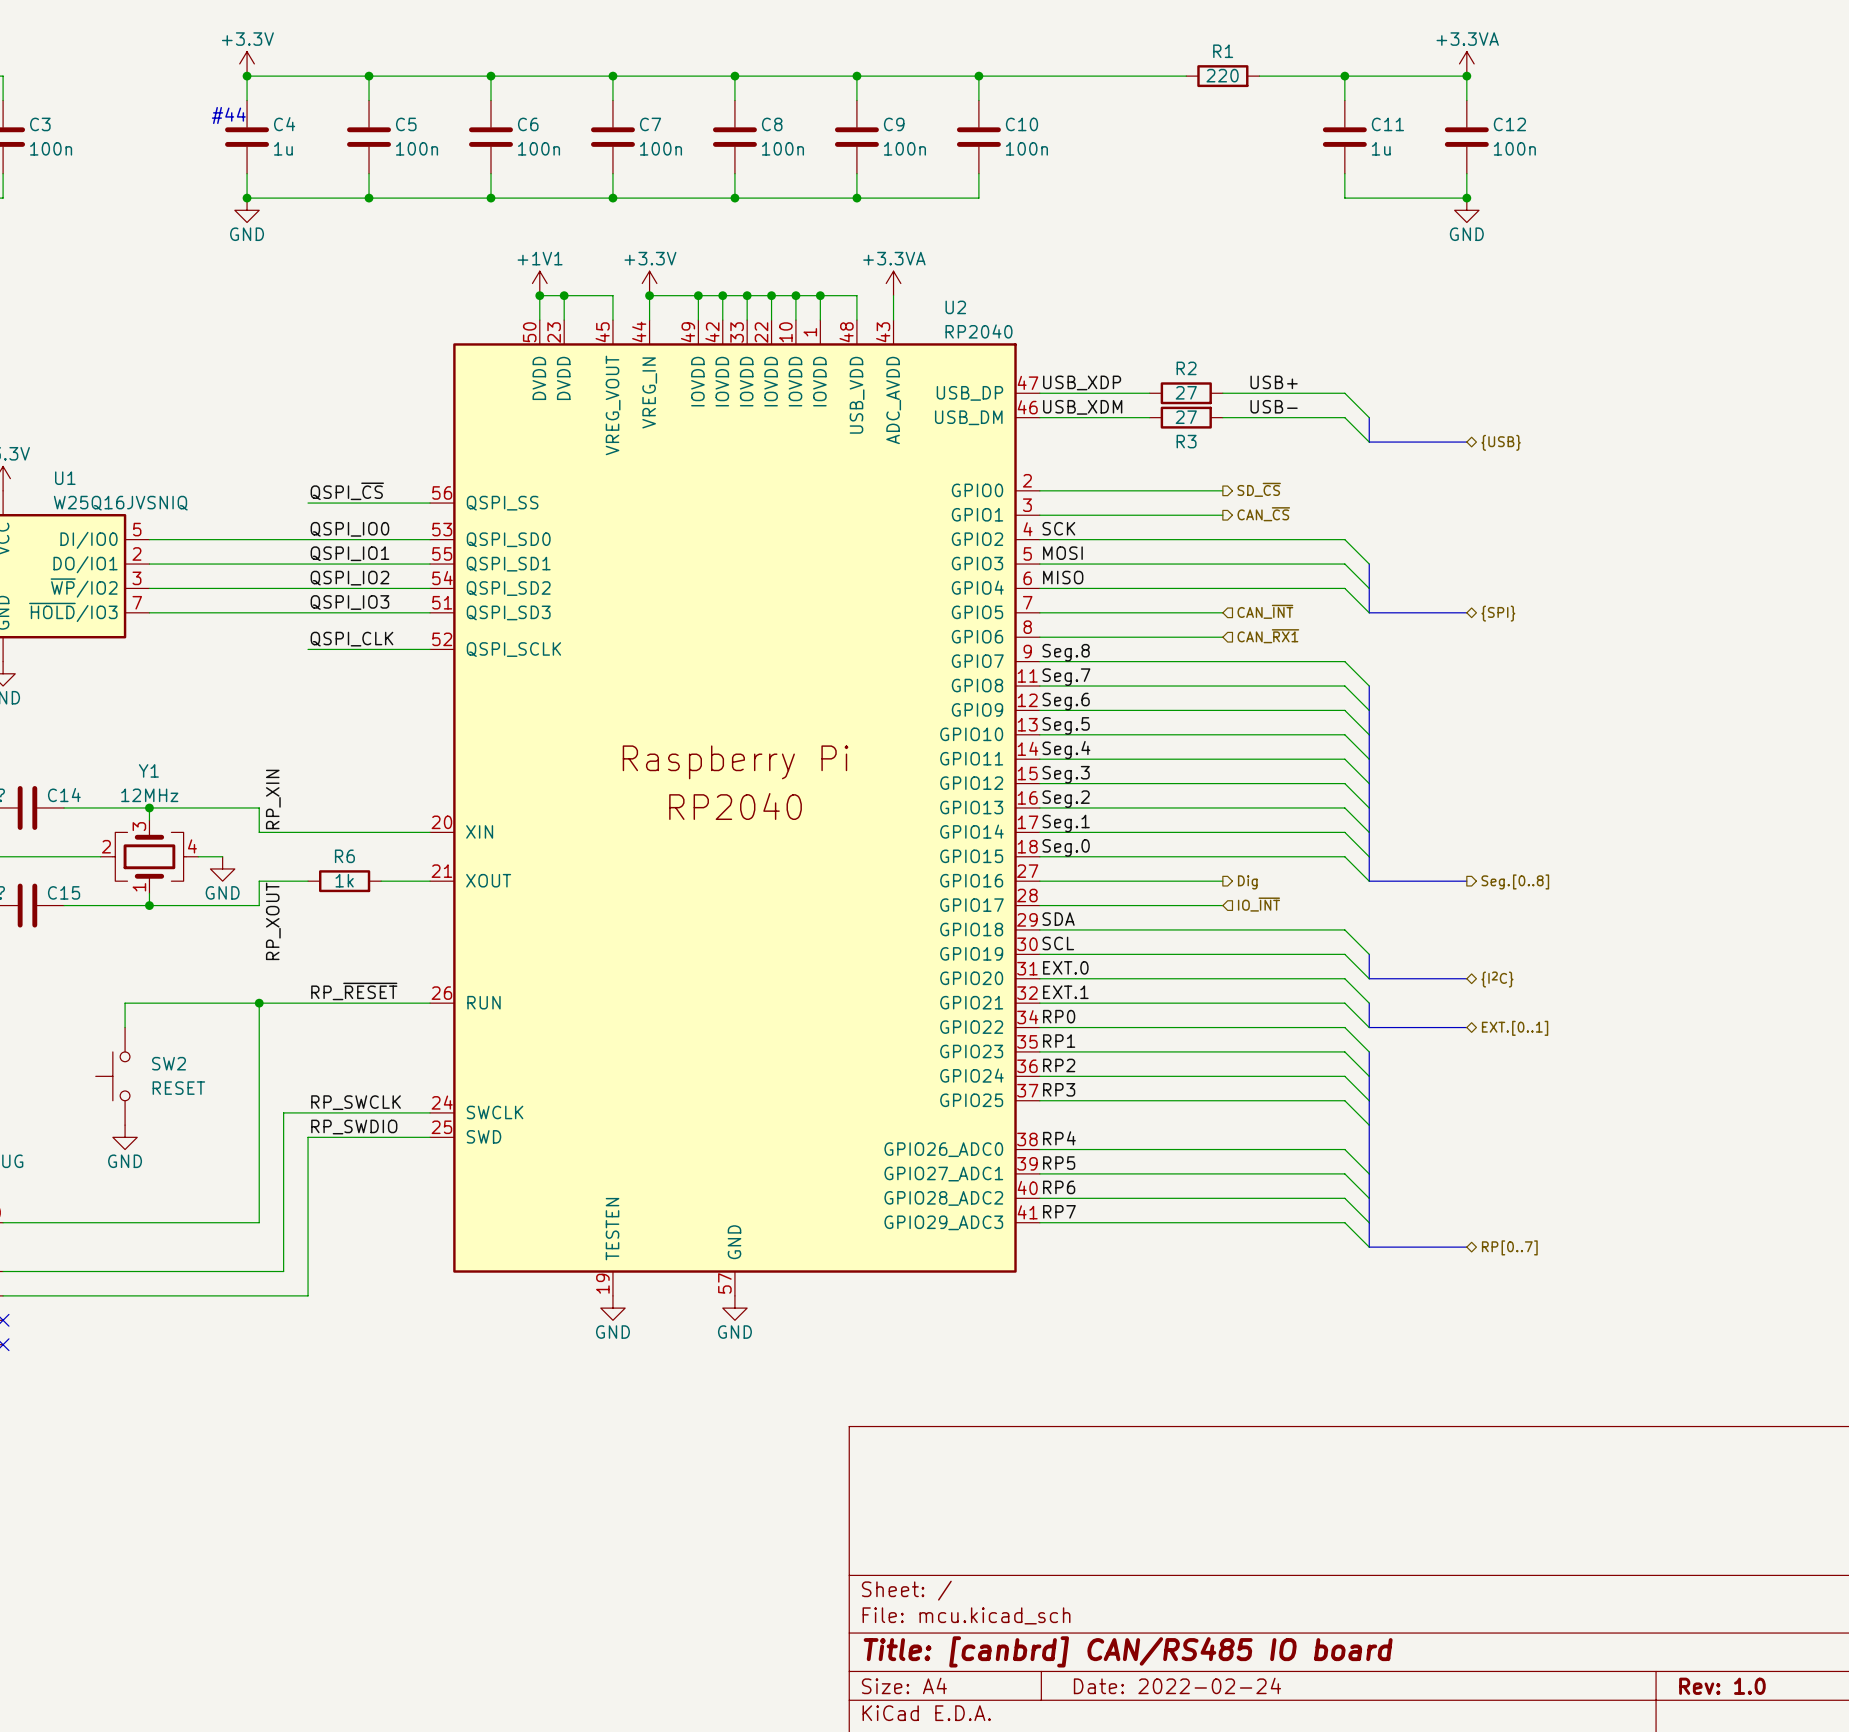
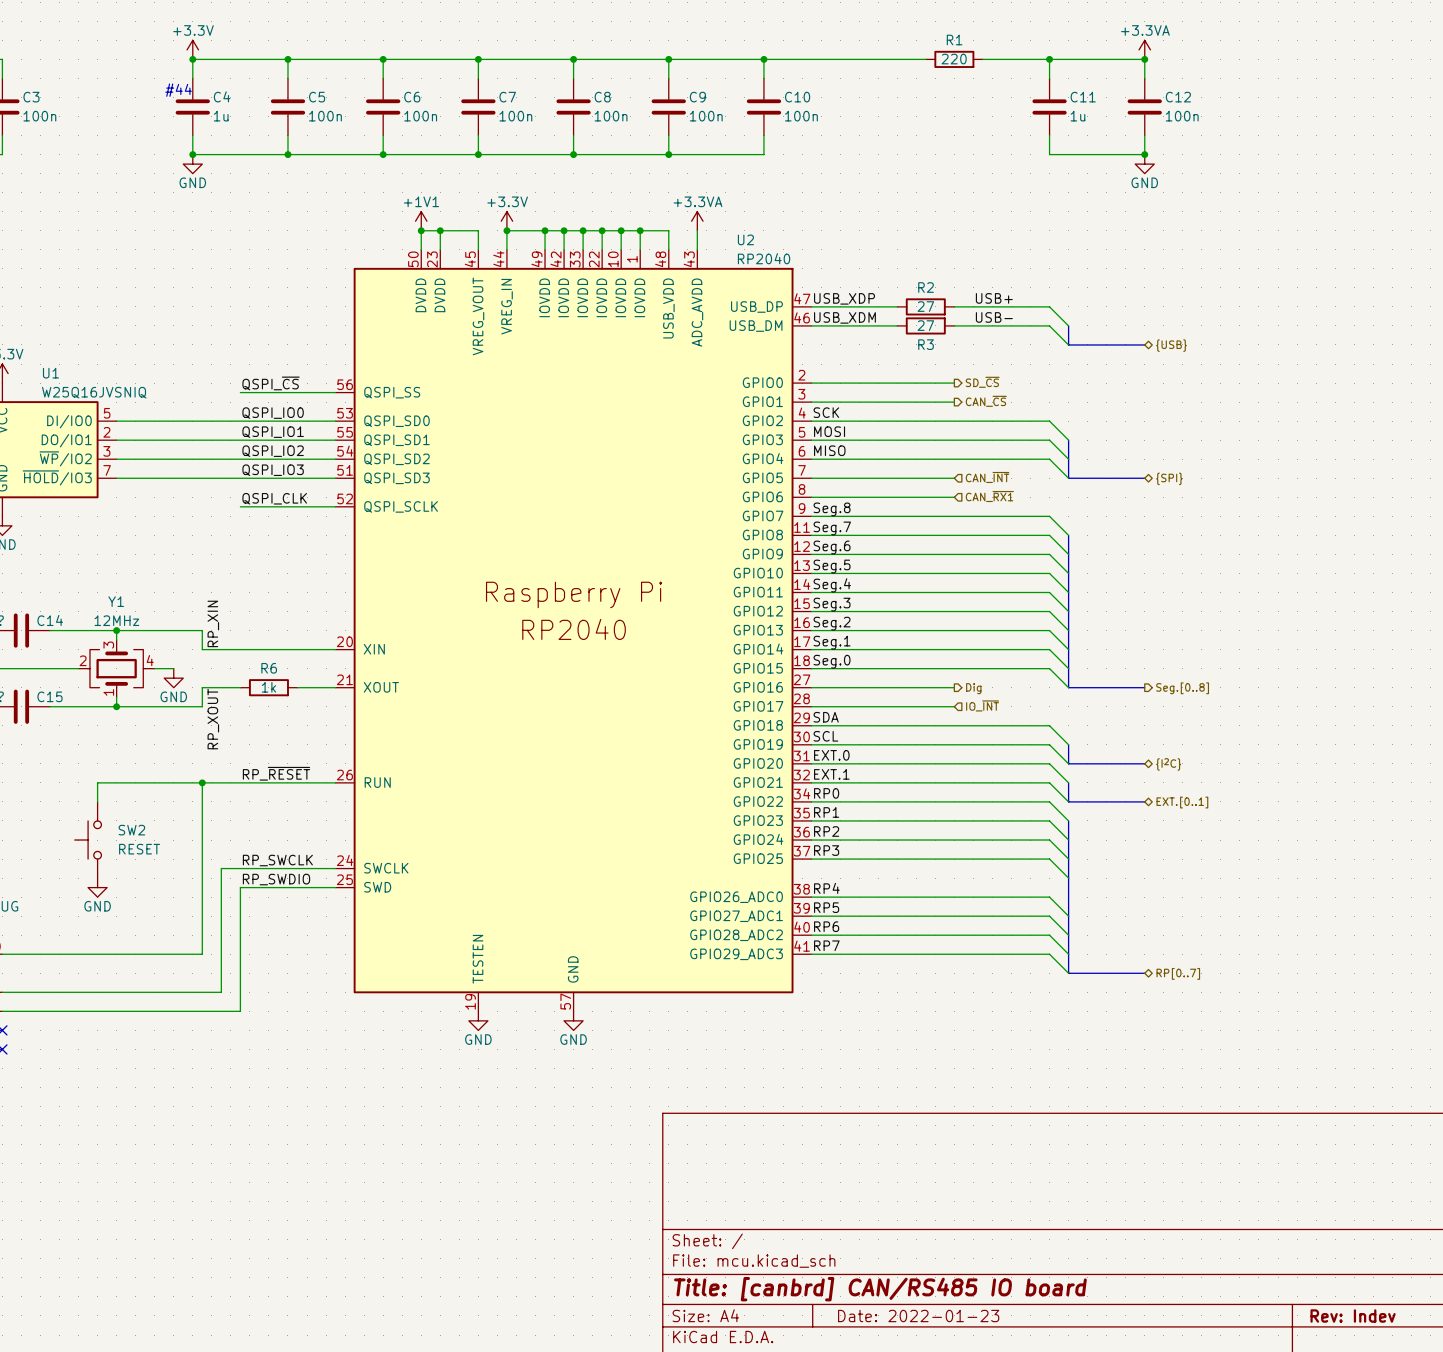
title block: Date: 2022-02-24 (1177, 1685) -> Date: 2022-01-23 (918, 1316)
title block: Rev: 1.0 (1722, 1686) -> Rev: Indev (1353, 1316)

